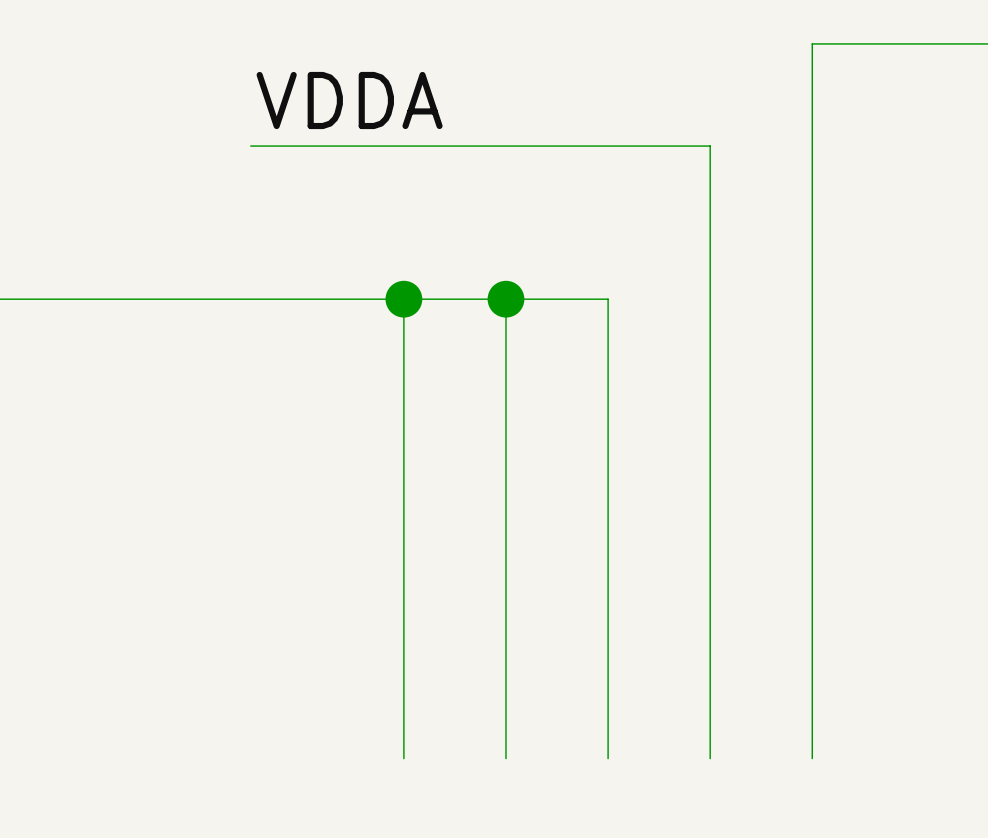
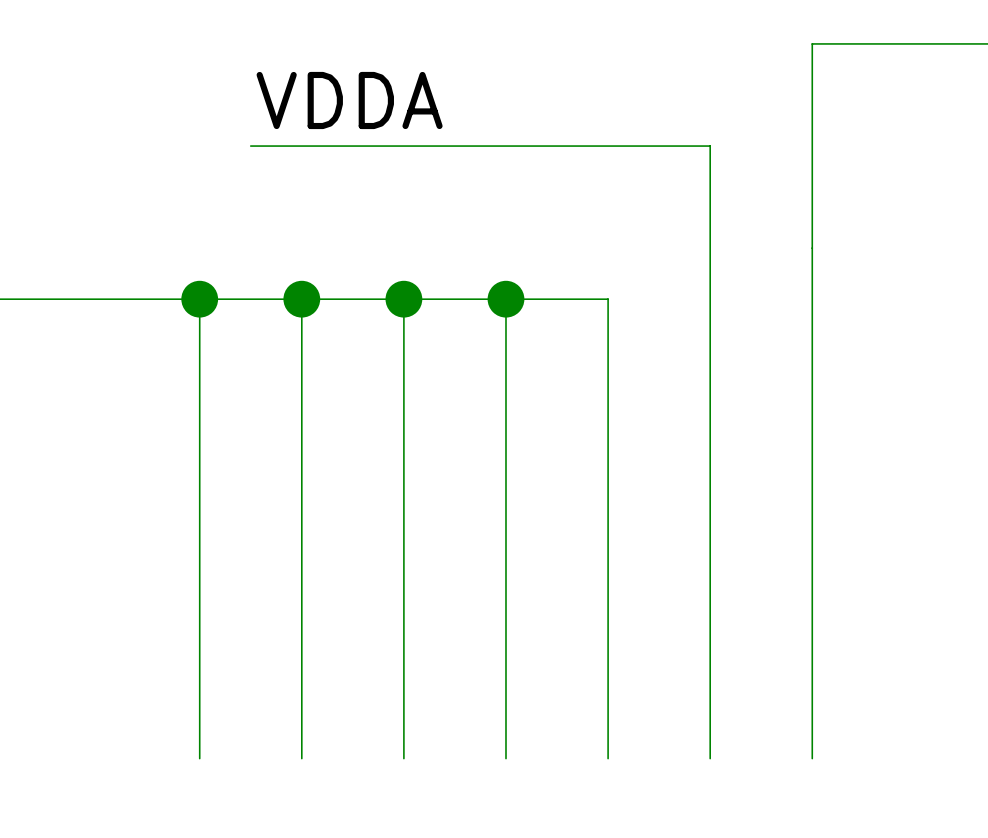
wire: none -> (199, 299) (199, 758)
junction: none -> (199, 299)
wire: none -> (301, 299) (301, 758)
junction: none -> (301, 299)

